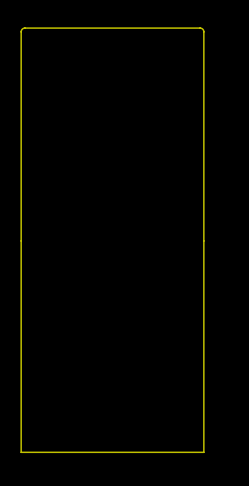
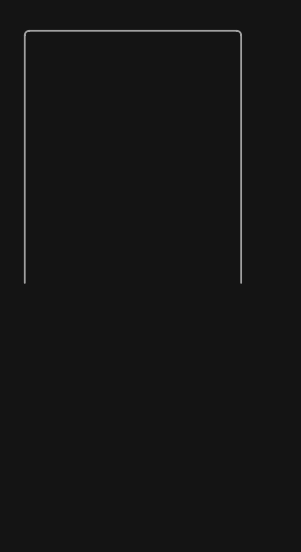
board edge: (203, 240) (203, 452) (21, 452) (21, 240) -> none

